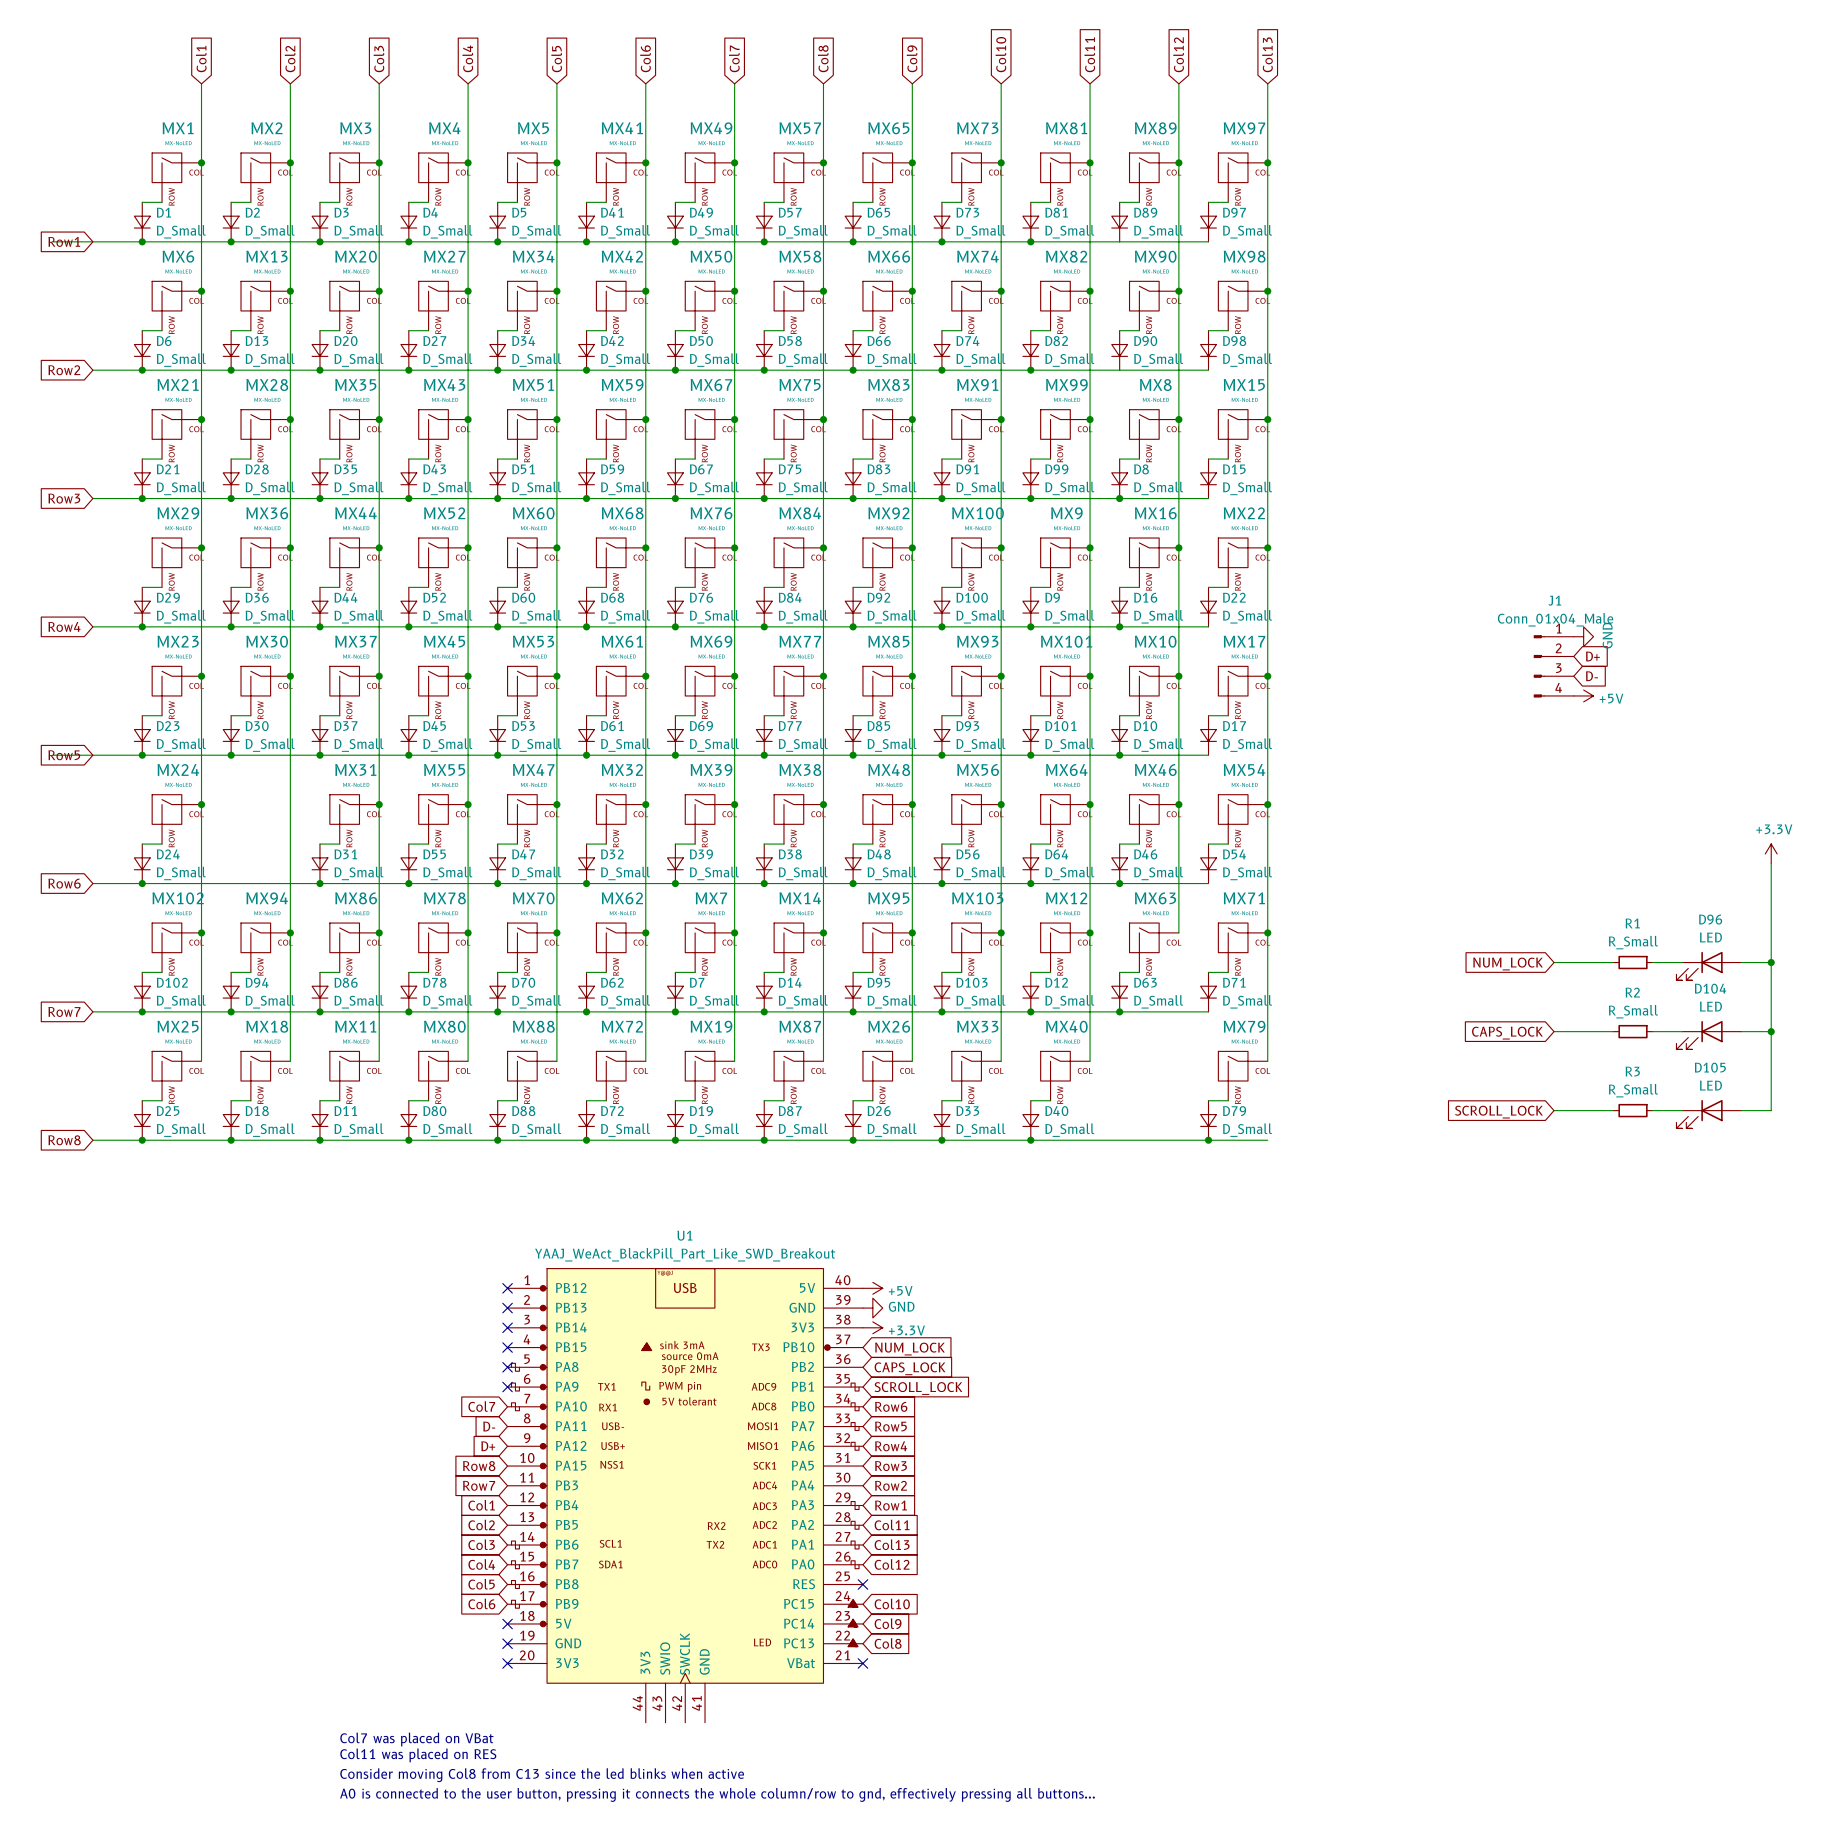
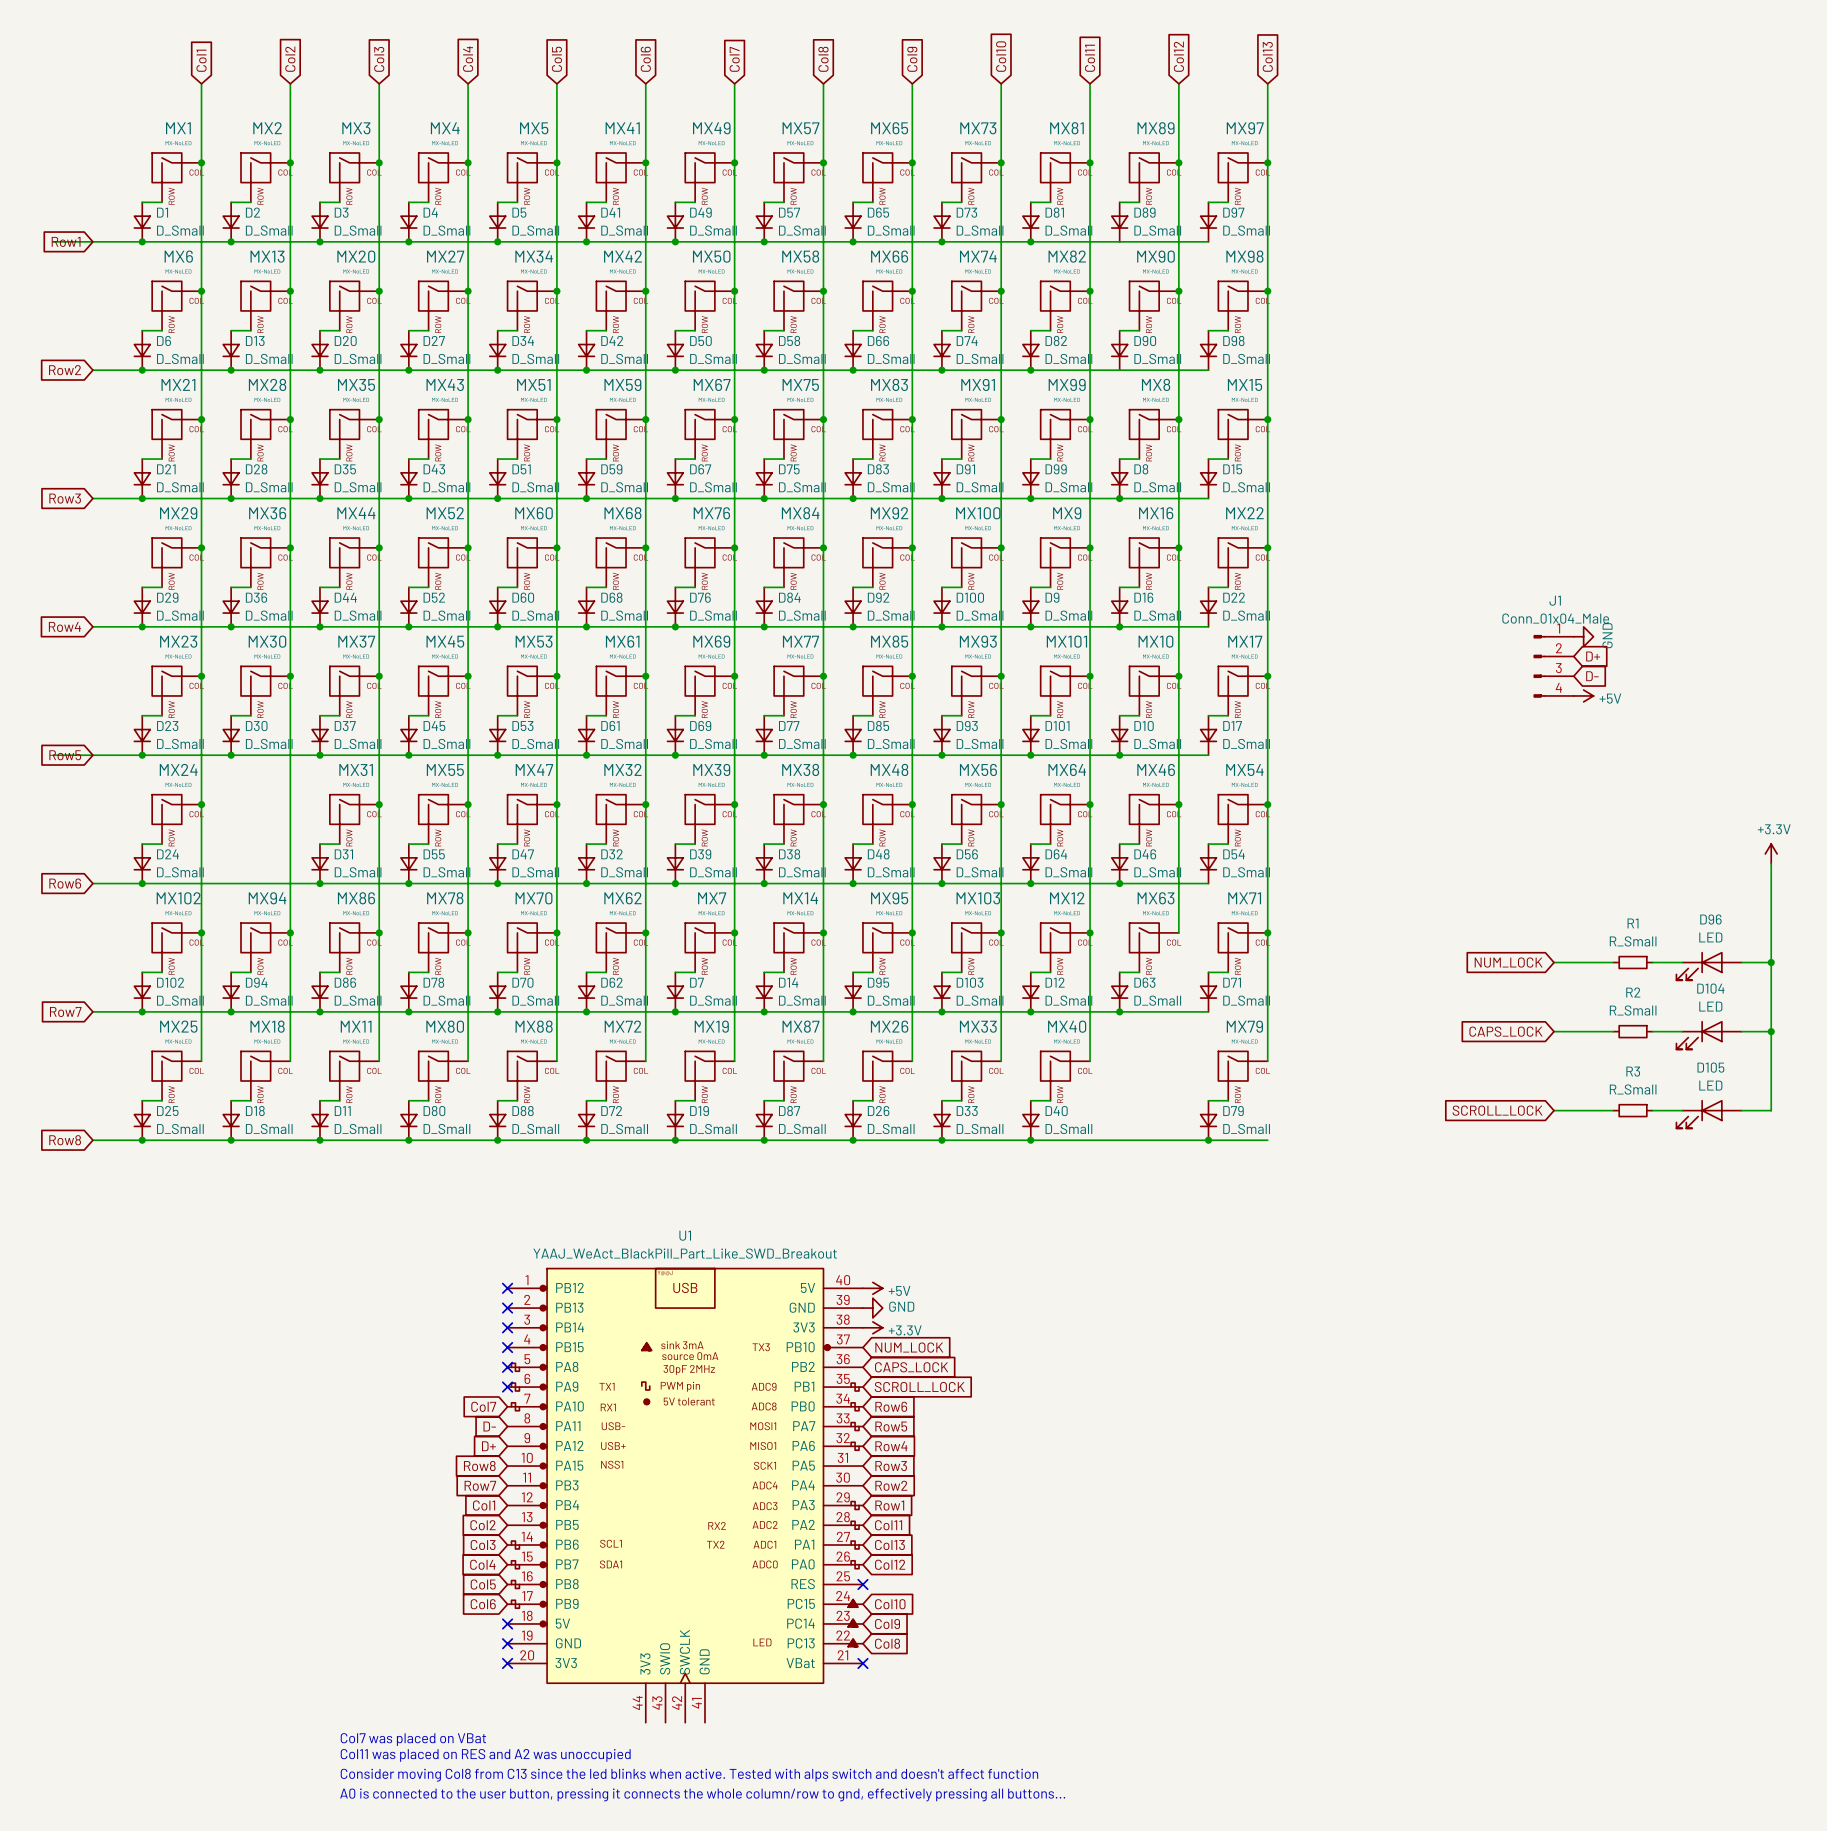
text: Col11 was placed on RES (418, 1755) -> Col11 was placed on RES and A2 was unoccupied (485, 1755)
text: Consider moving Col8 from C13 since the led blinks when active (542, 1775) -> Consider moving Col8 from C13 since the led blinks when active. Tested with alps switch and doesn't affect function (689, 1775)

